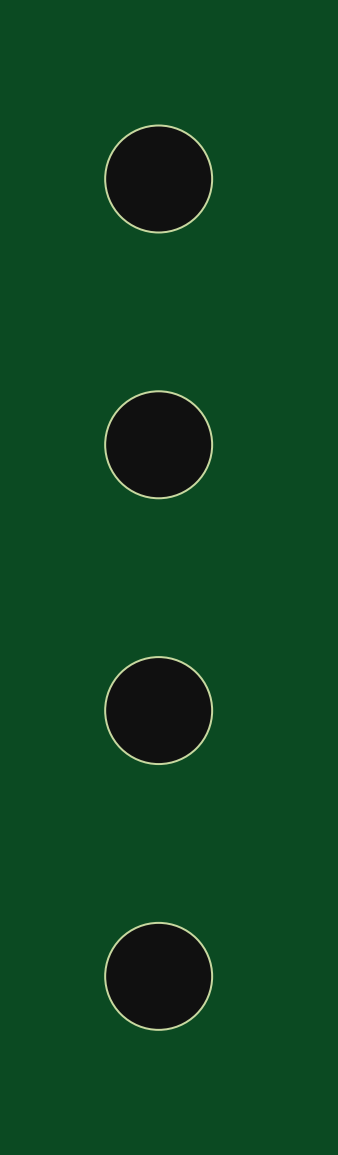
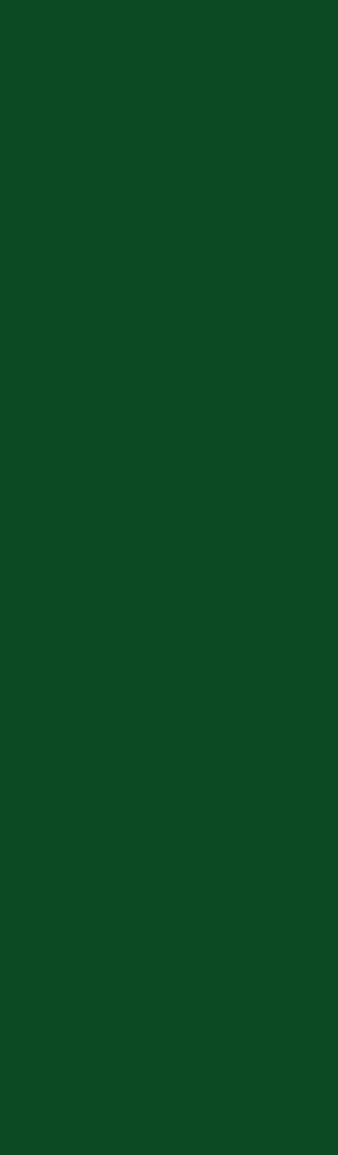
part: (158, 178) -> none
part: (158, 444) -> none
part: (158, 710) -> none
part: (158, 976) -> none

